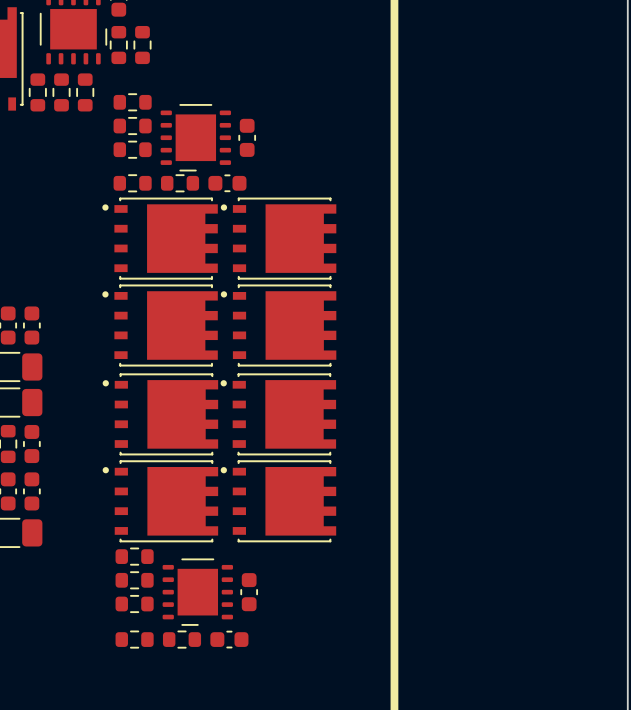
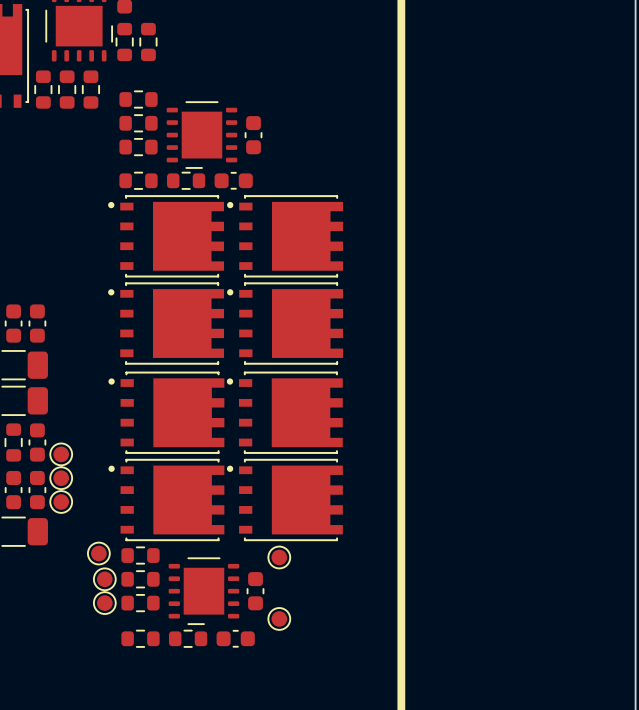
part: none -> (61, 454)
part: none -> (61, 478)
part: none -> (61, 501)
part: none -> (98, 553)
part: none -> (279, 557)
part: none -> (104, 579)
part: none -> (104, 603)
part: none -> (279, 618)

